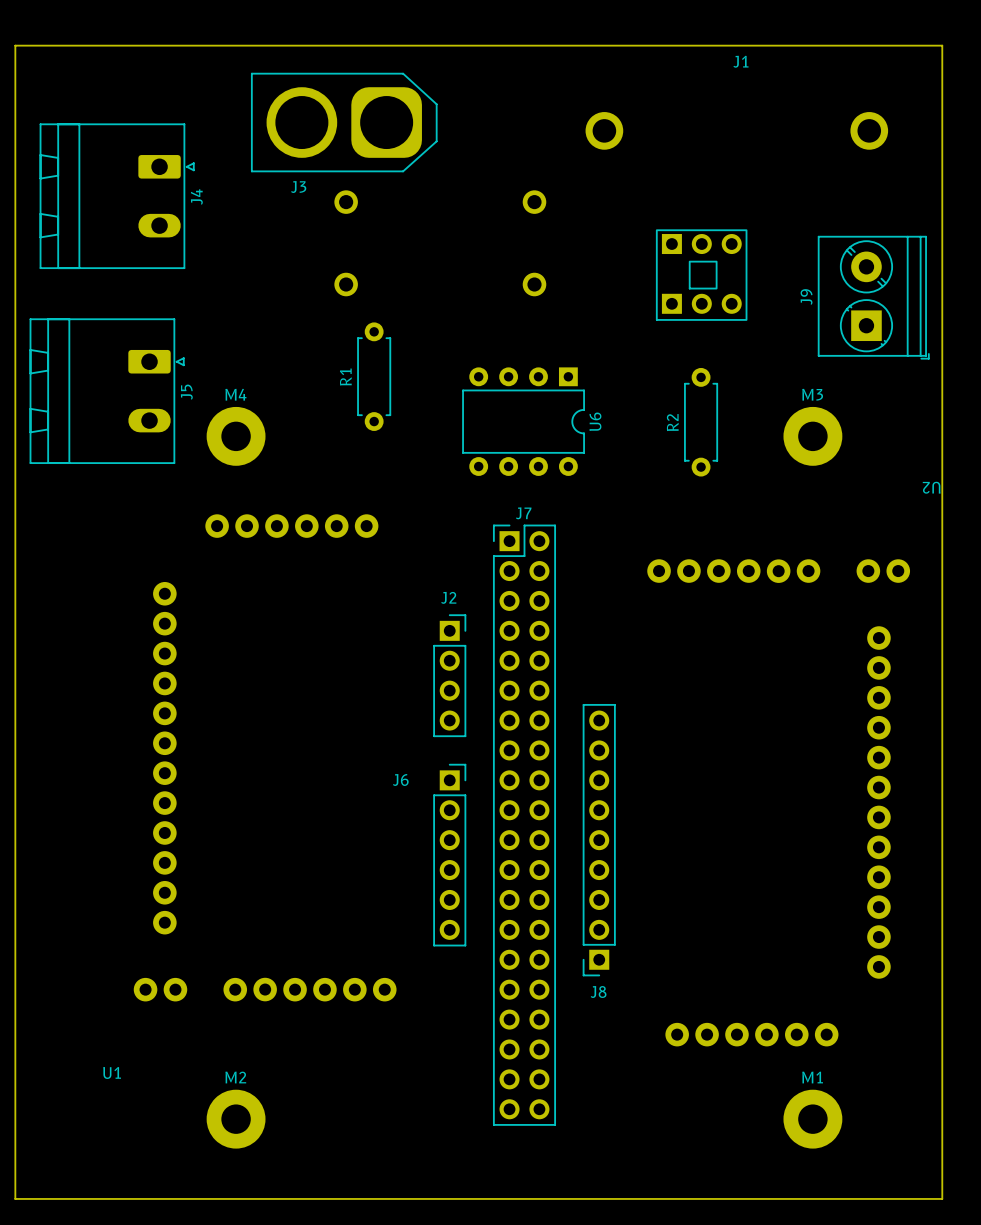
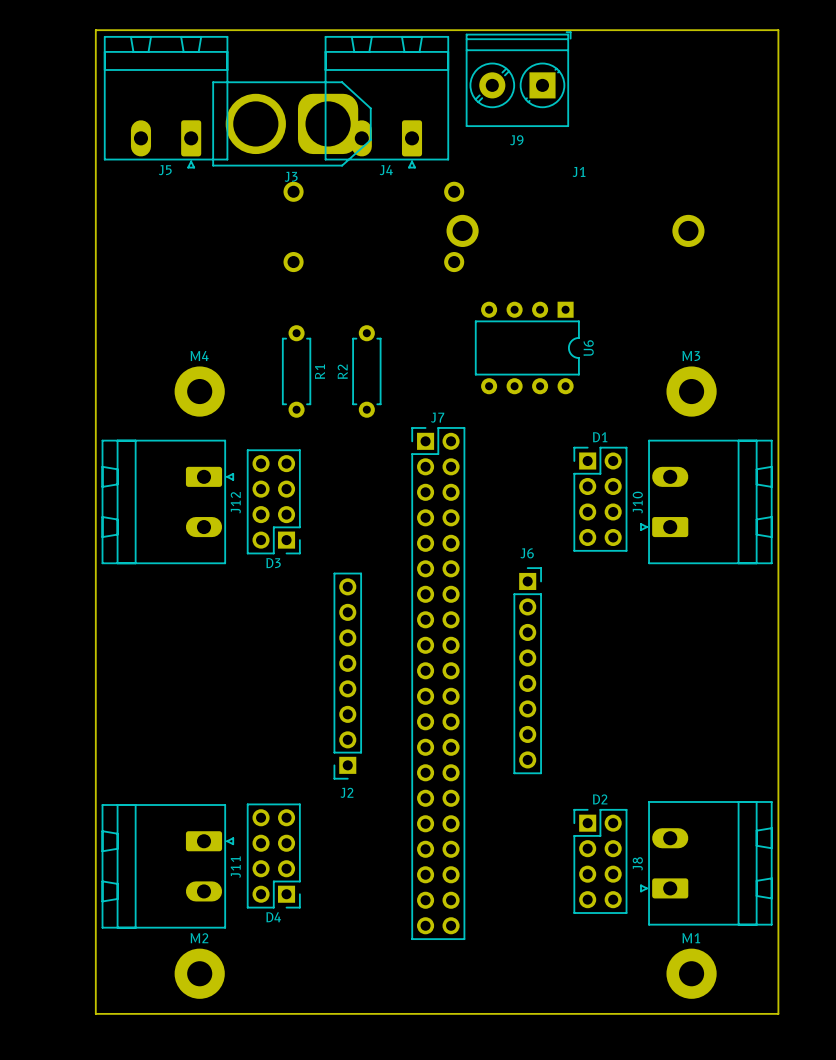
board edge: (15, 45) (942, 45) (942, 1198) (15, 1198) (15, 45) -> (95, 30) (95, 1013) (778, 1013) (778, 30) (95, 30)
J1 position: (736, 130) -> (575, 230)
J3 name position: J3 (298, 187) -> J3 (291, 176)
J4 rotation: 0° (117, 196) -> 90° clockwise (386, 102)
J4 position: (117, 196) -> (386, 102)
part: (701, 275) -> none
J9 rotation: 0° (873, 297) -> 90° counterclockwise (518, 79)
J9 position: (873, 297) -> (518, 79)
R1 position: (374, 376) -> (296, 371)
R1 name position: R1 (345, 377) -> R1 (319, 371)
J5 rotation: 0° (107, 391) -> 90° clockwise (166, 102)
J5 position: (107, 391) -> (166, 102)
U6 position: (523, 421) -> (527, 347)
R2 position: (701, 422) -> (366, 371)
D1: none -> (600, 499)
J12: none -> (167, 501)
D3: none -> (273, 501)
J10: none -> (706, 501)
J2 name position: J2 (448, 597) -> J2 (346, 792)
J2 footprint: [433, 614, 467, 737] -> [333, 572, 362, 780]
J8 footprint: [582, 704, 616, 977] -> [640, 801, 773, 926]
U1: (265, 757) -> none
J6 footprint: [433, 763, 467, 947] -> [513, 567, 542, 774]
J6 name position: J6 (400, 779) -> J6 (527, 553)
U2: (778, 802) -> none
J7 position: (524, 825) -> (438, 683)
D4: none -> (273, 855)
D2: none -> (600, 861)
J8 name position: J8 (598, 991) -> J8 (637, 863)
J11: none -> (167, 866)

